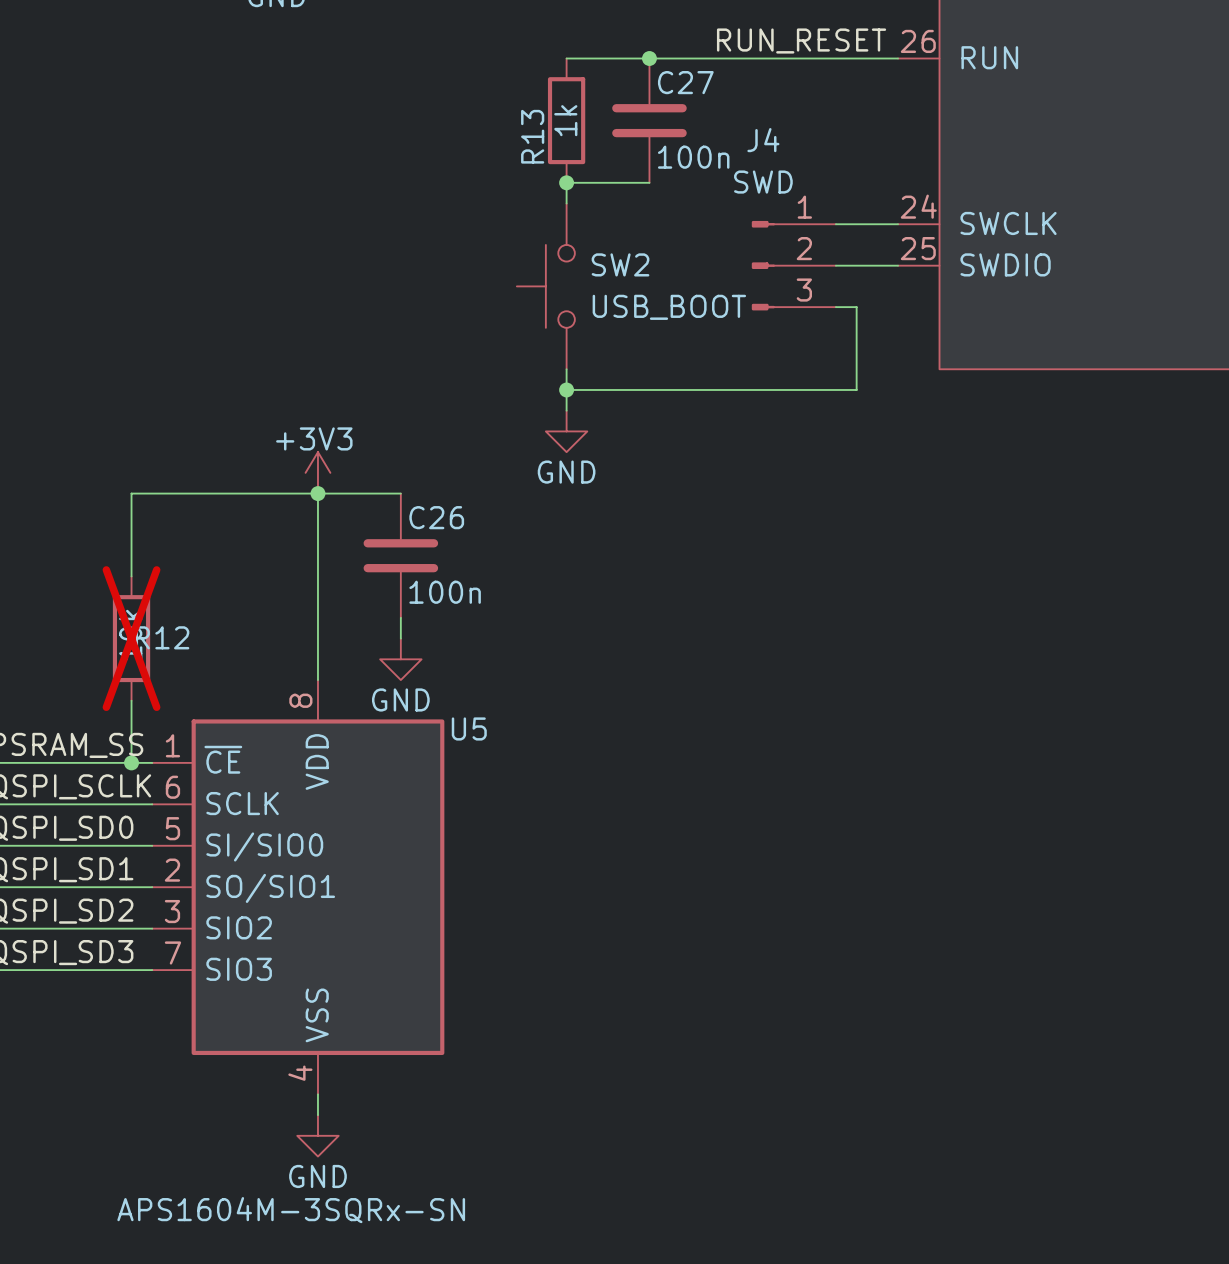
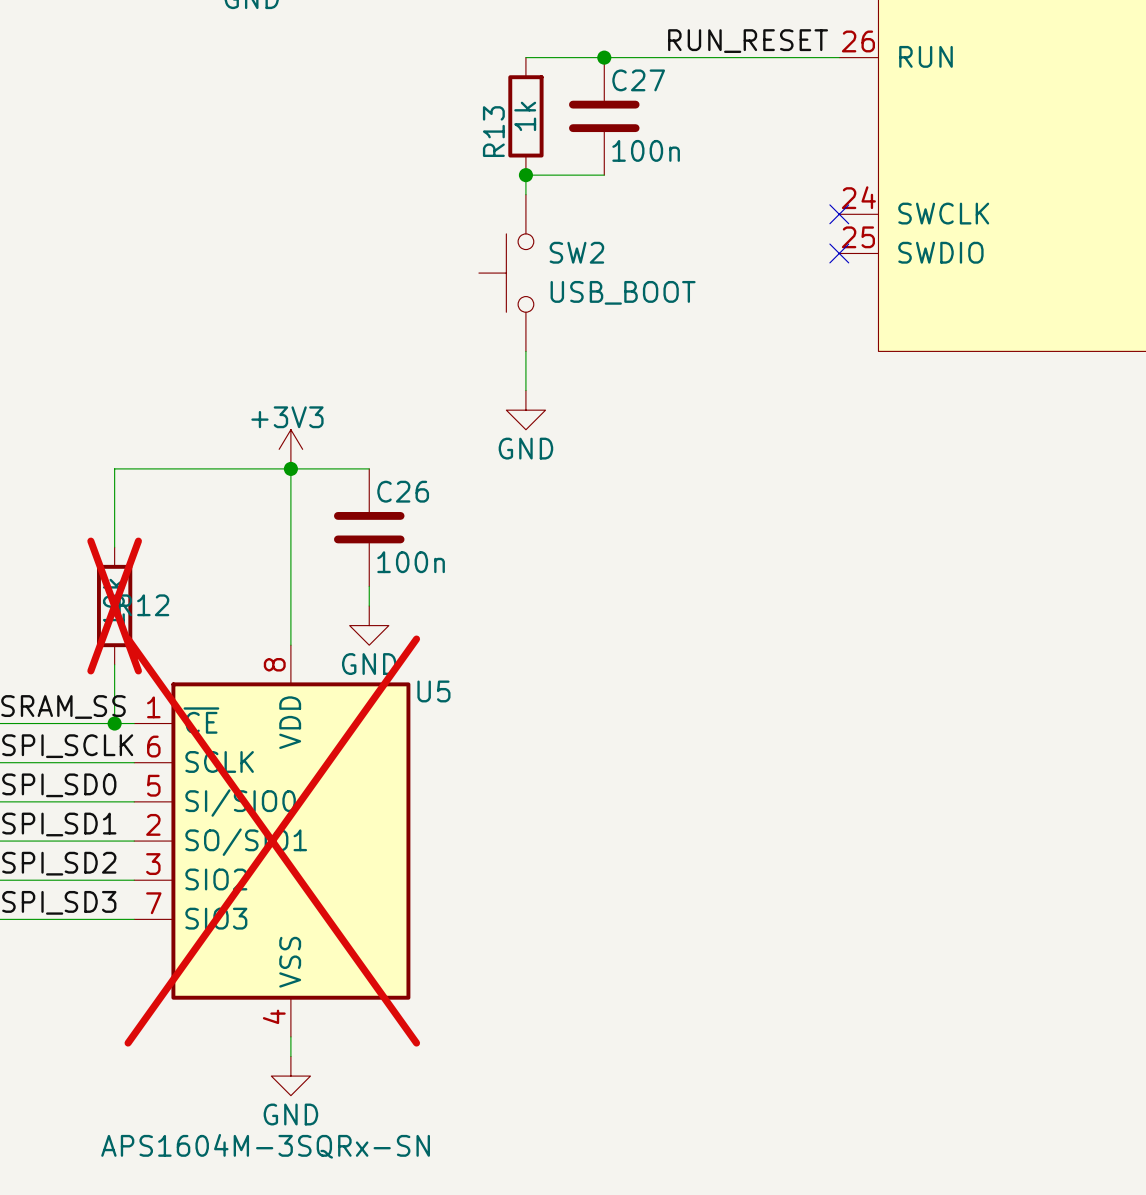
wire: (835, 224) (898, 224) -> none
no-connect mark: none -> (839, 214)
J4: SWD (793, 265) -> none
wire: (835, 265) (898, 265) -> none
no-connect mark: none -> (839, 253)
wire: (835, 307) (856, 307) (856, 389) (566, 389) -> none
junction: (566, 389) -> none
U5 do-not-place cross: none -> (272, 841)

